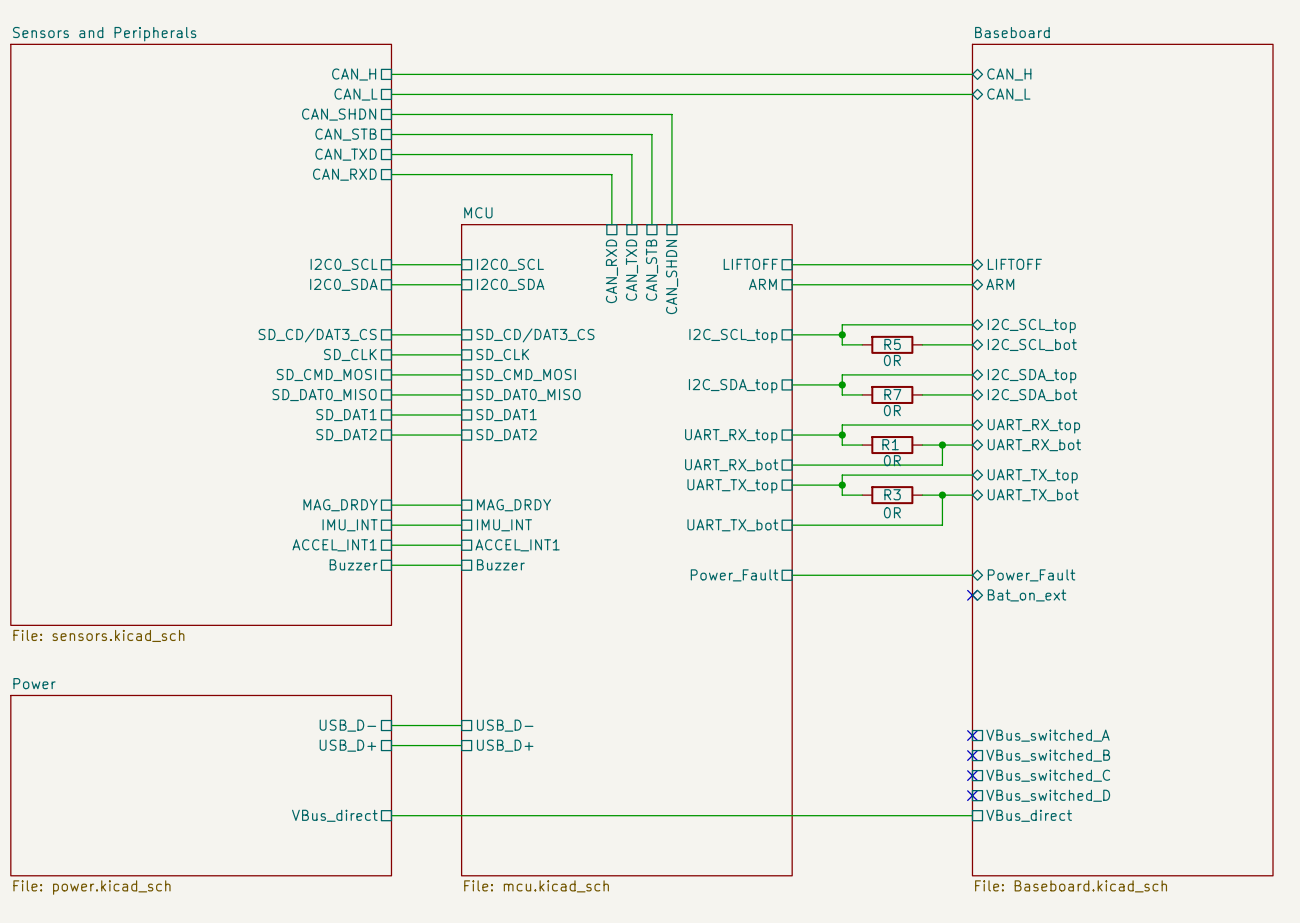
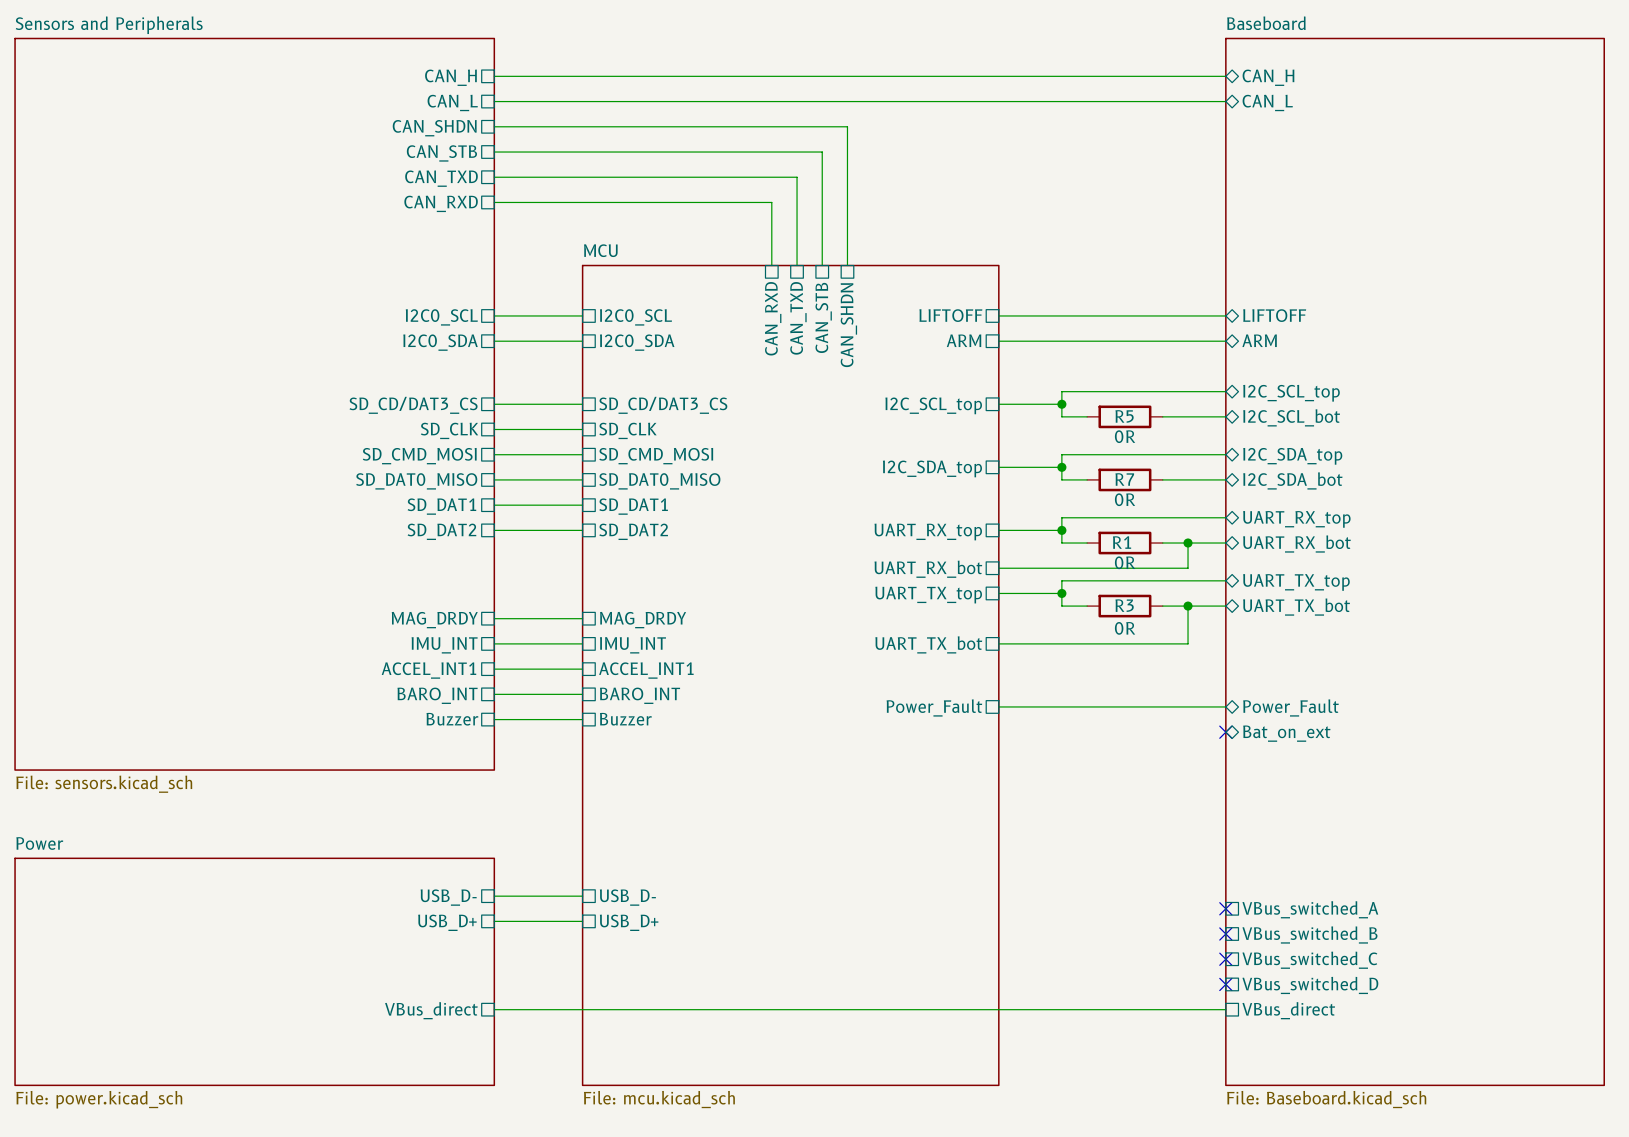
sheet pin: Buzzer (353, 564) -> BARO_INT (437, 695)
sheet pin: Buzzer (500, 564) -> BARO_INT (640, 695)
sheet pin: none -> Buzzer (452, 719)
sheet pin: none -> Buzzer (625, 719)
wire: none -> (494, 719) (582, 719)

